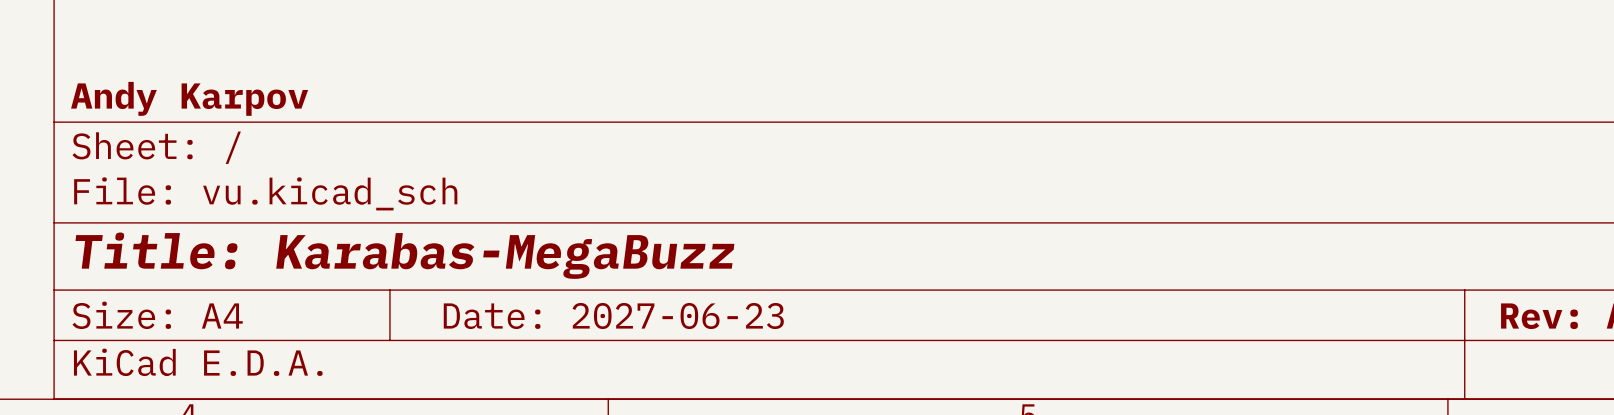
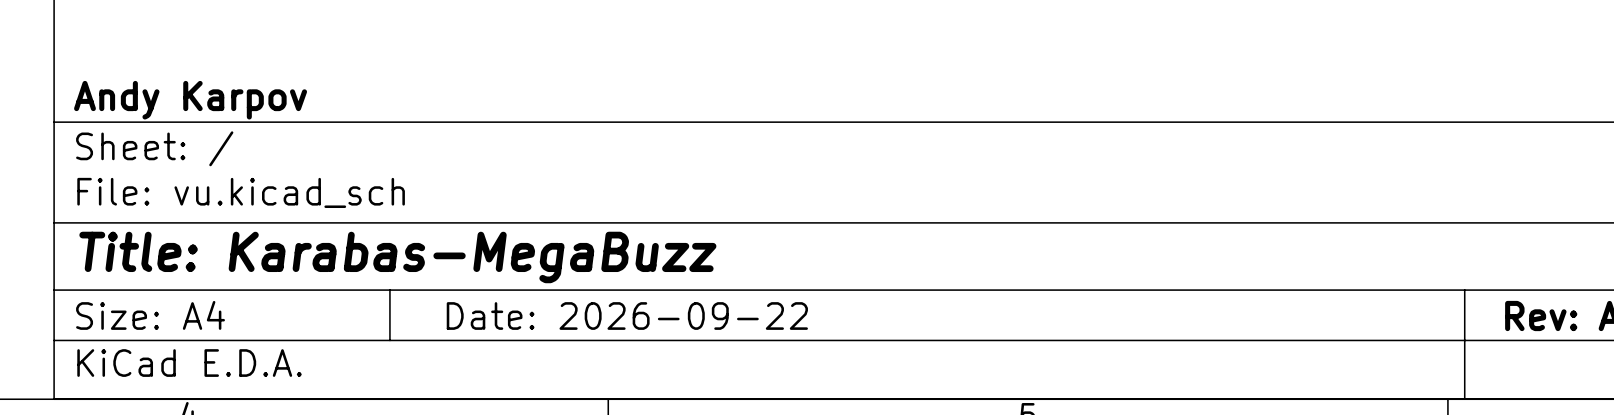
title block: Date: 2027-06-23 (613, 316) -> Date: 2026-09-22 (627, 316)

